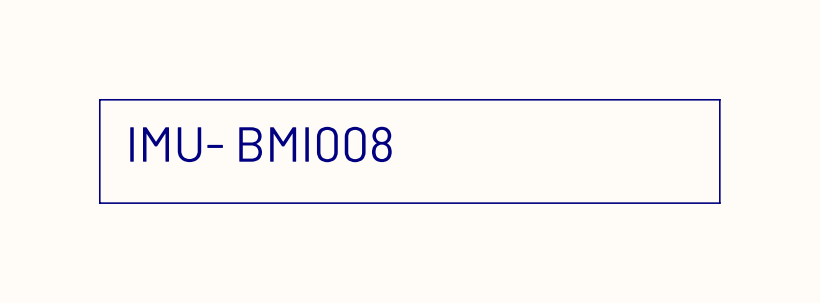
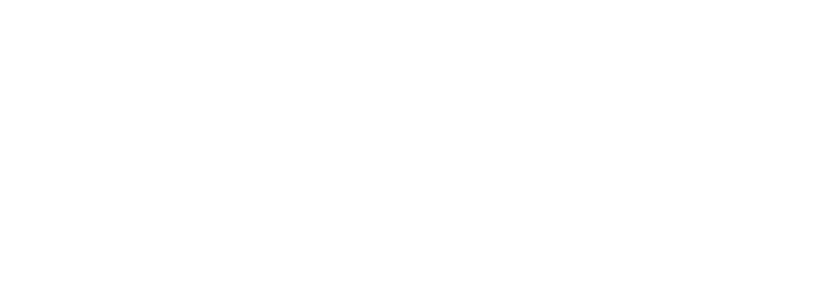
line: (99, 99) (719, 99) (719, 203) (99, 203) (99, 99) -> none
text: IMU- BMI008 (260, 144) -> none

